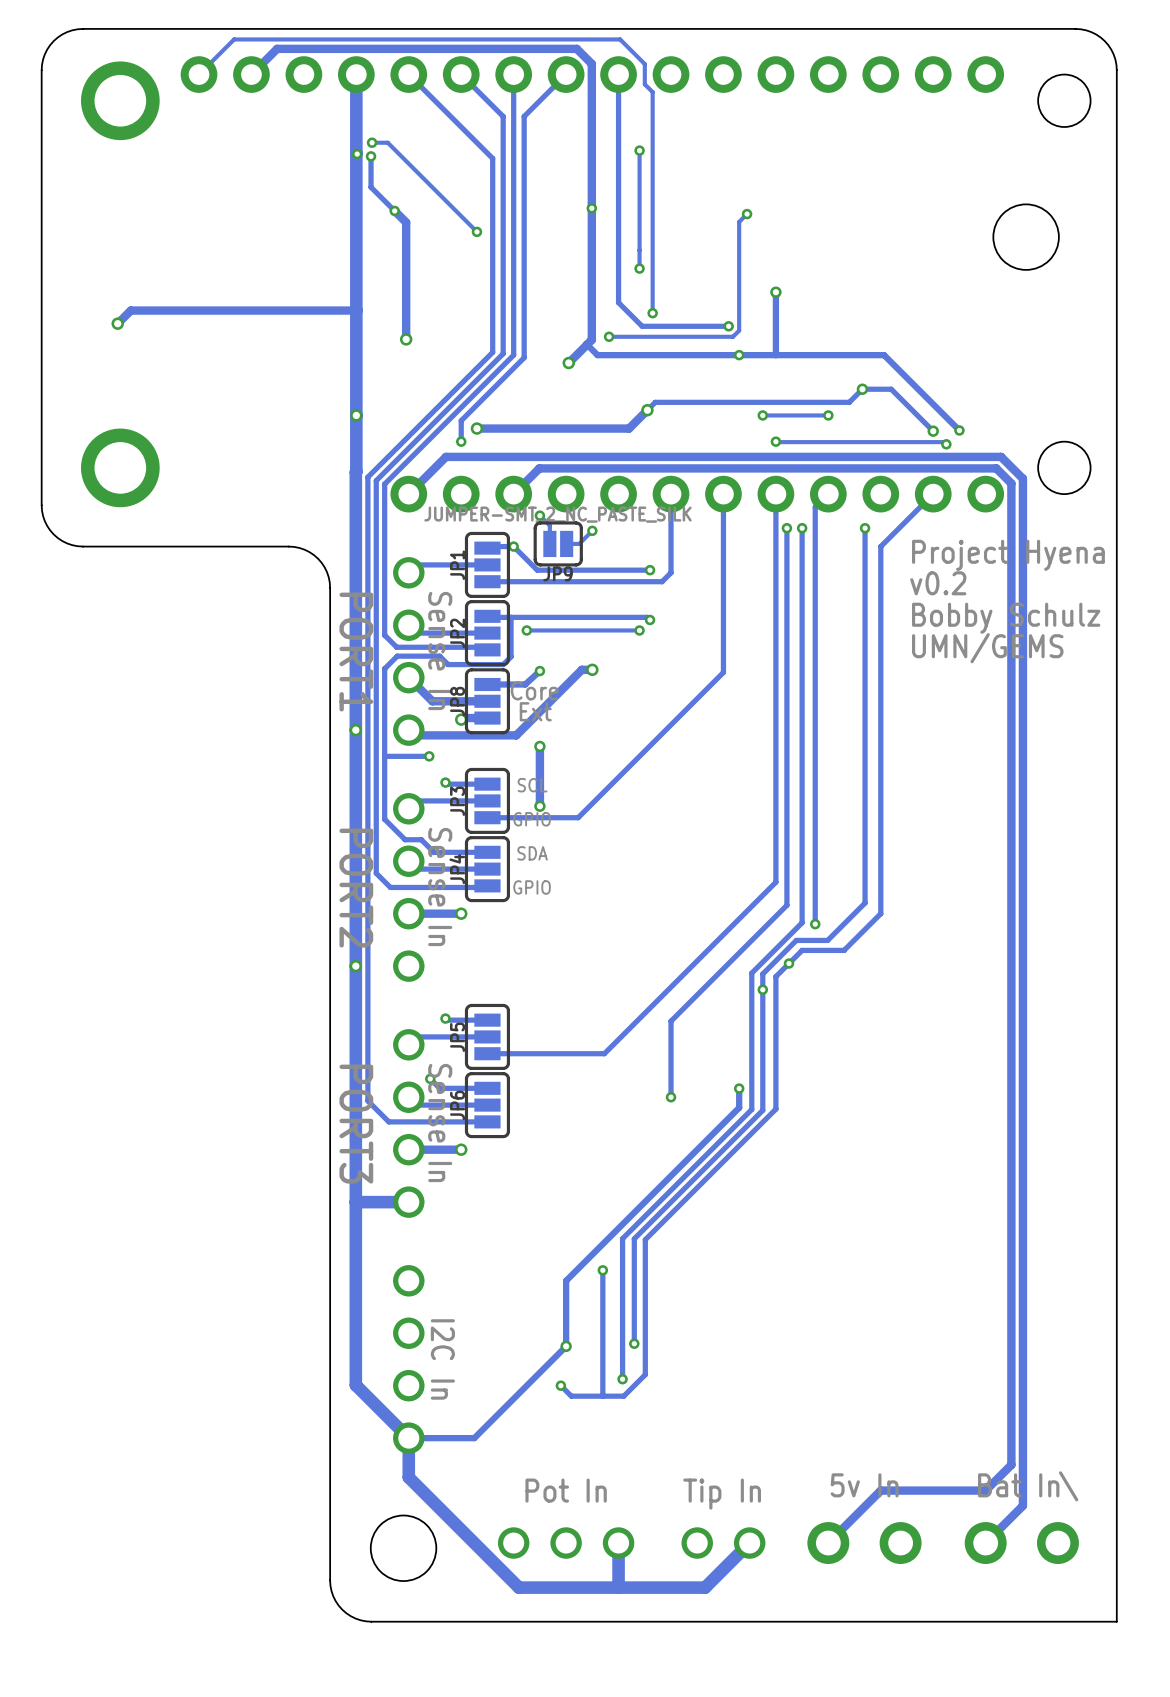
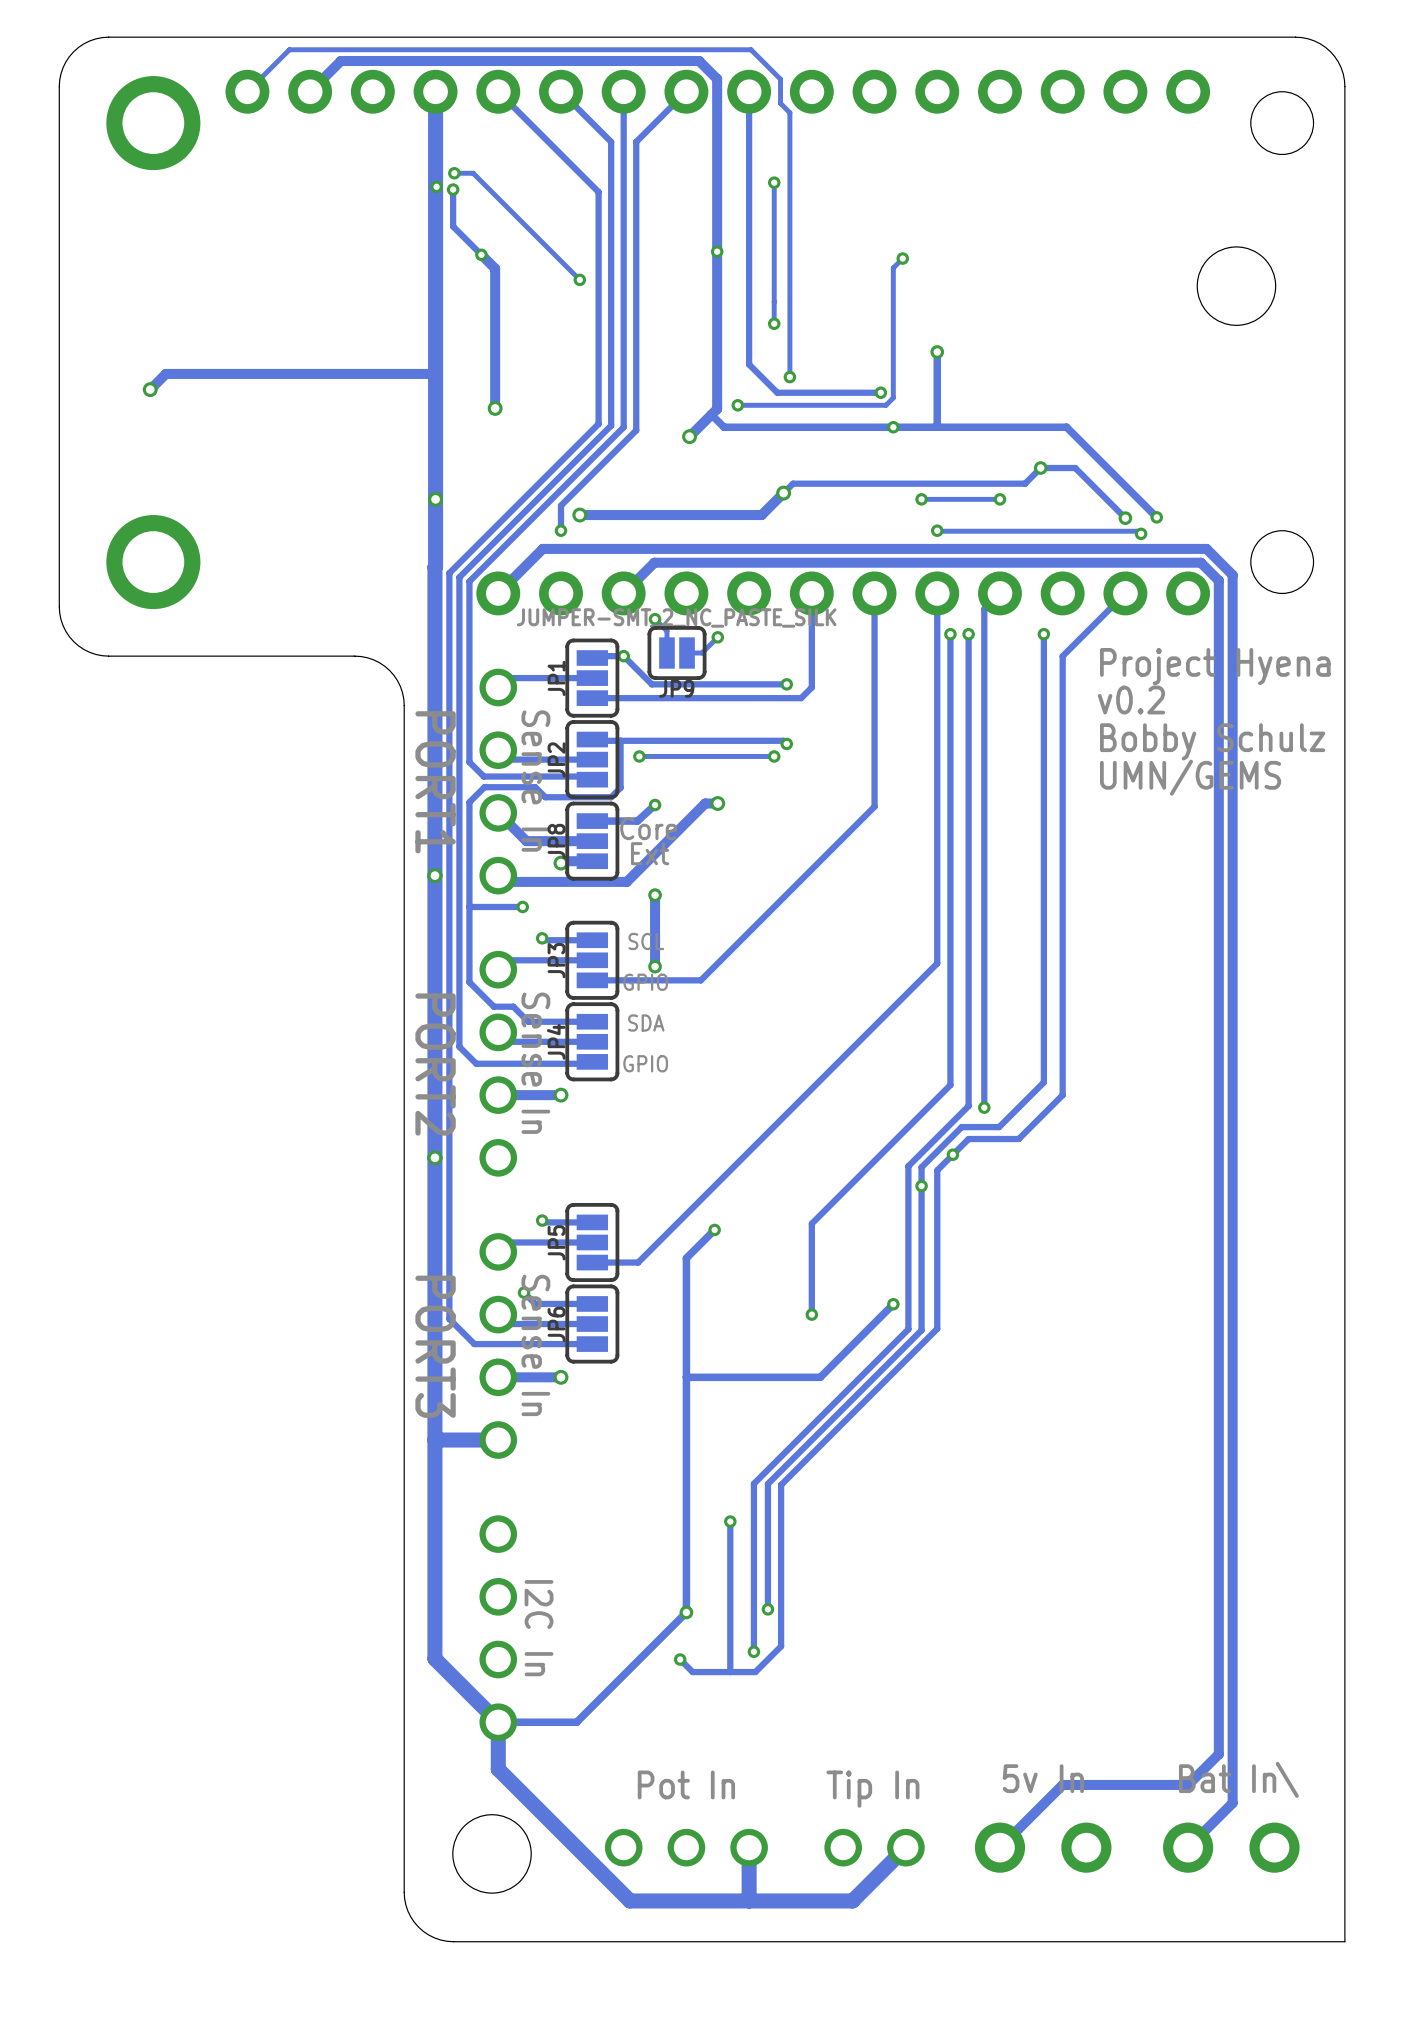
track: (775, 803) (775, 882) (604, 1053) (525, 1053) -> (937, 963) (638, 1262)
track: none -> (714, 1229) (686, 1258) (686, 1534)
via: none -> (714, 1229)
track: (739, 1088) (739, 1107) (566, 1280) -> (893, 1304) (820, 1377) (686, 1377)

